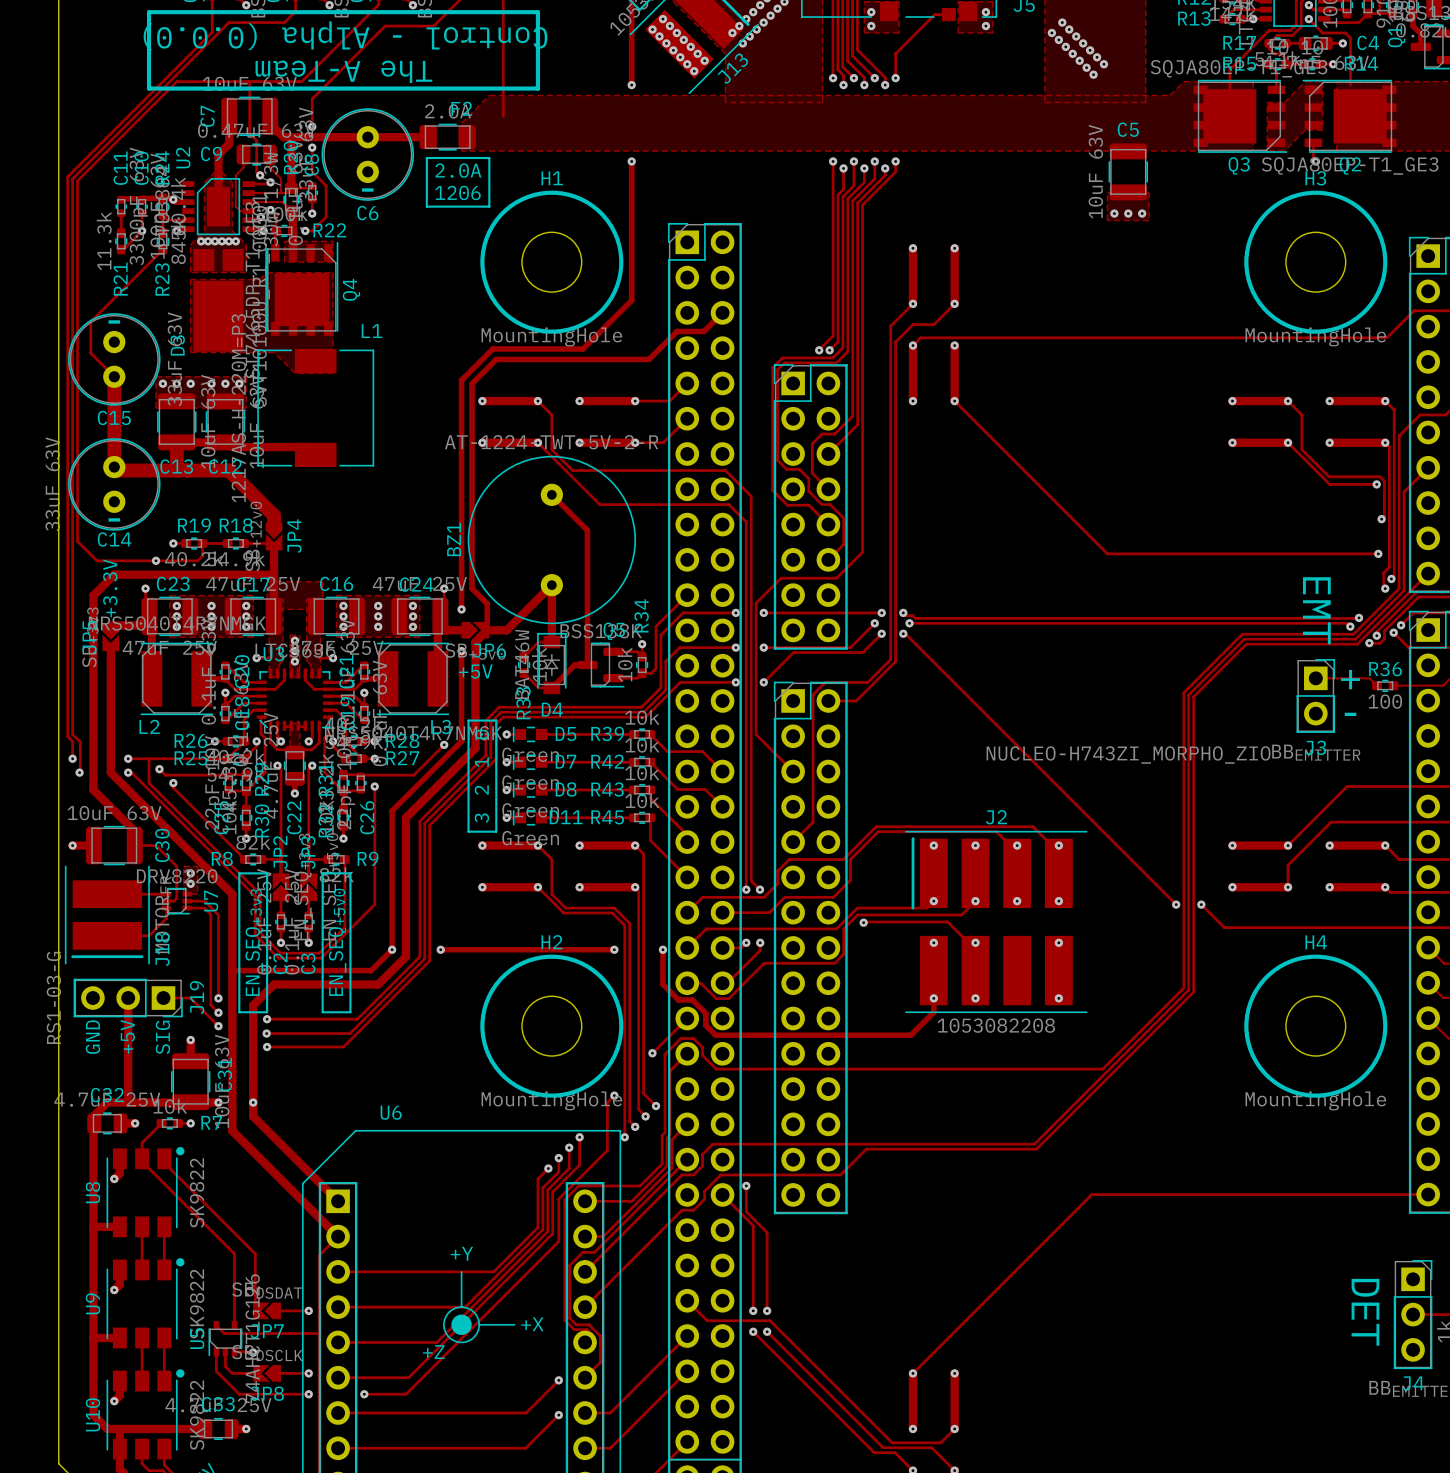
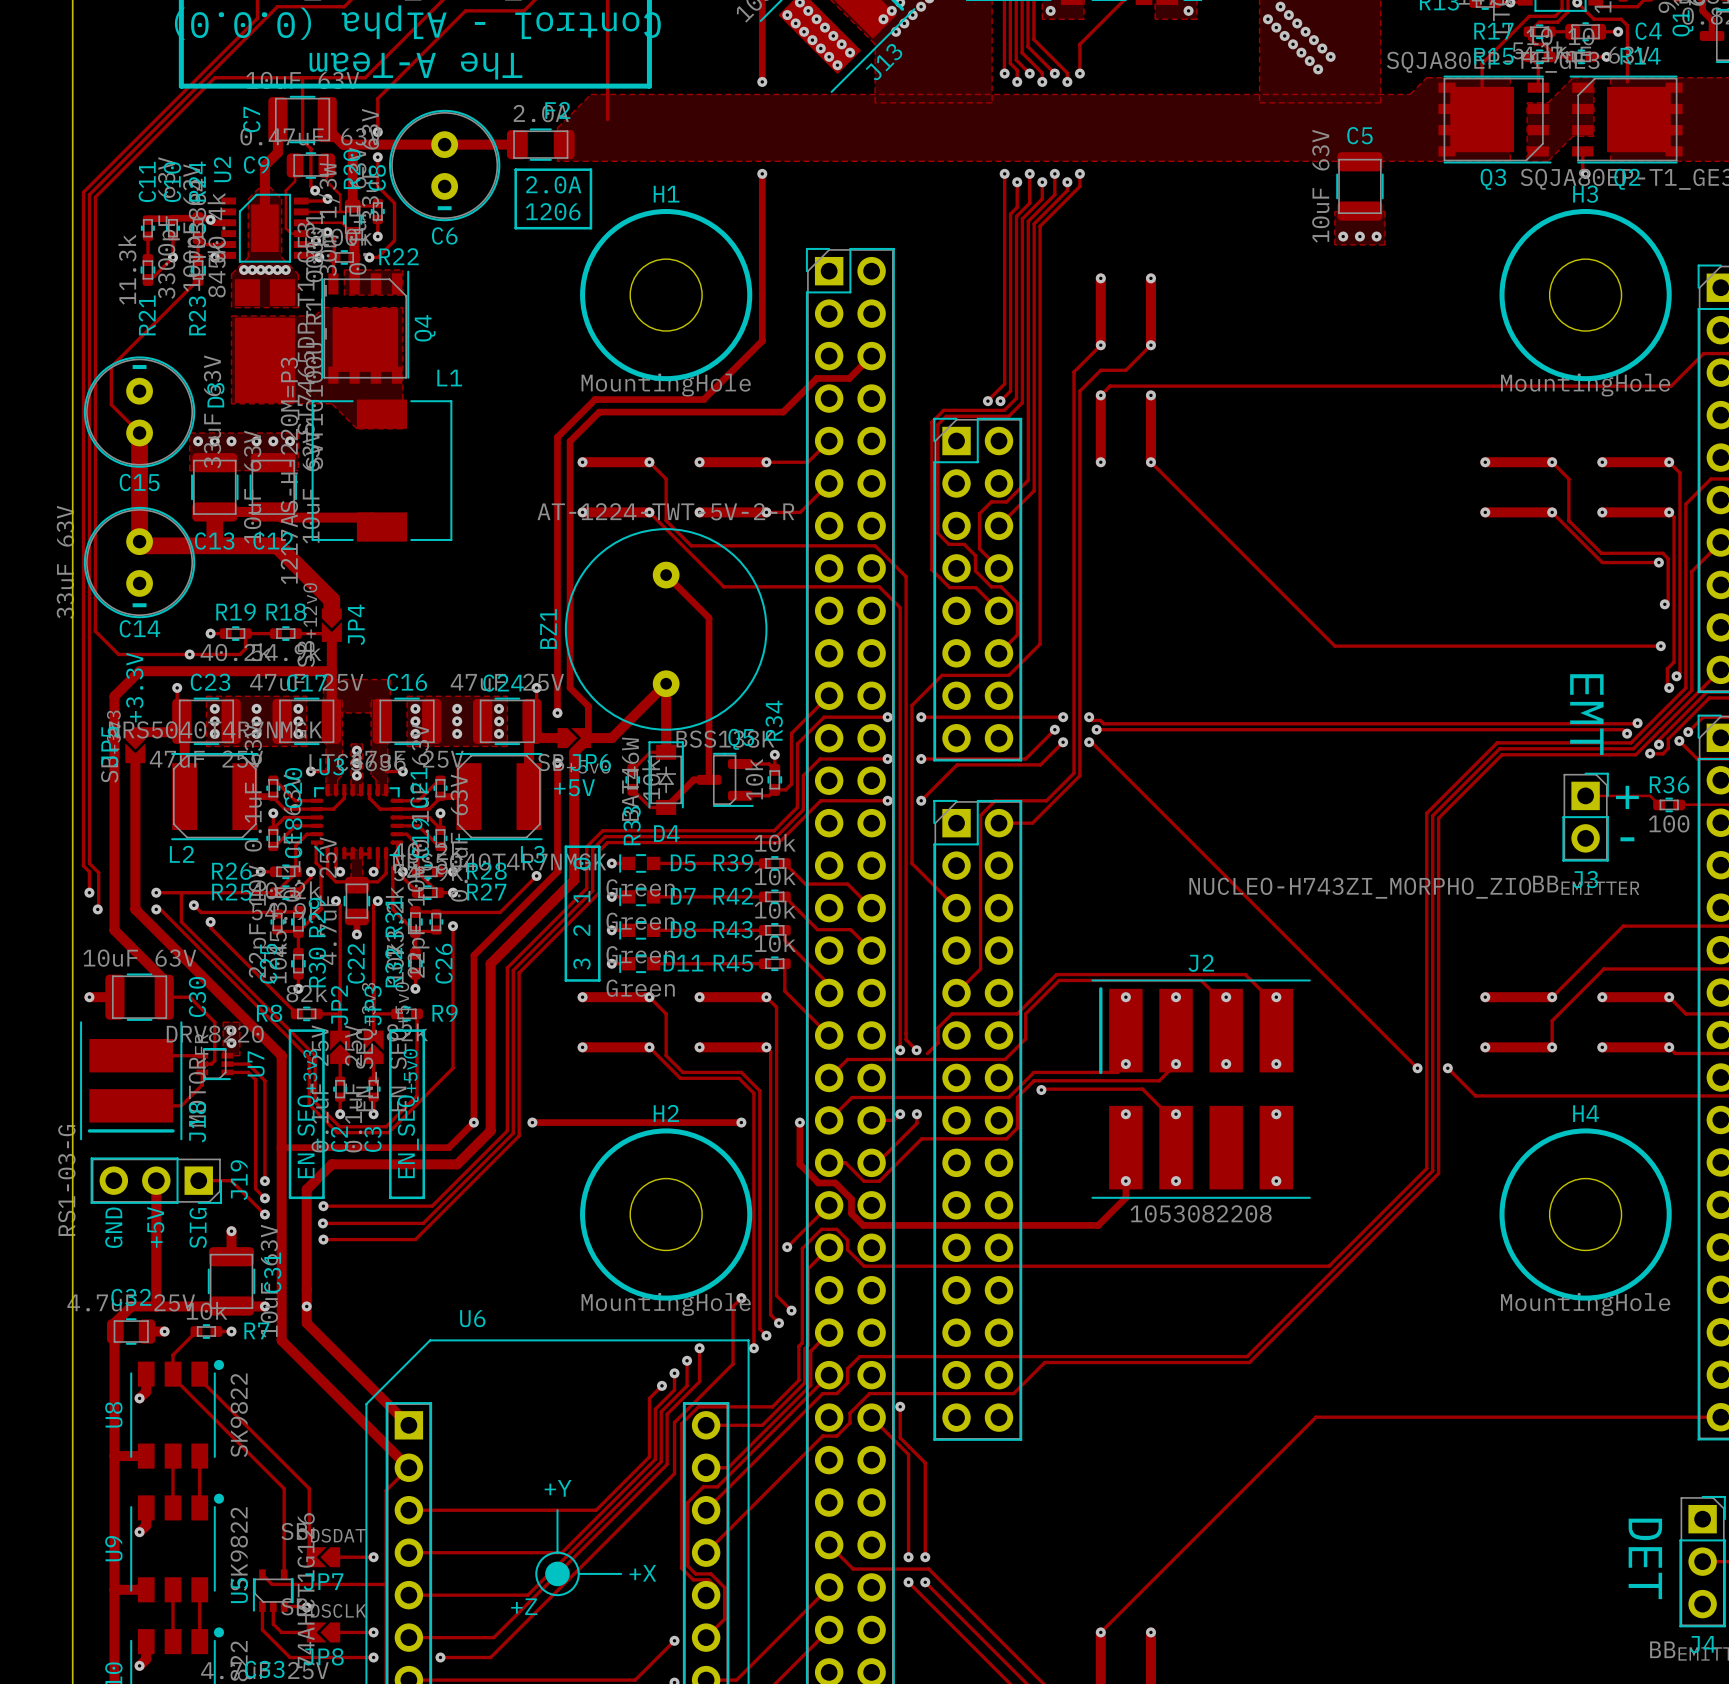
track: (768, 892) (763, 897) -> (946, 1059) (921, 1059)
track: (784, 897) (769, 912) (722, 912) -> none

